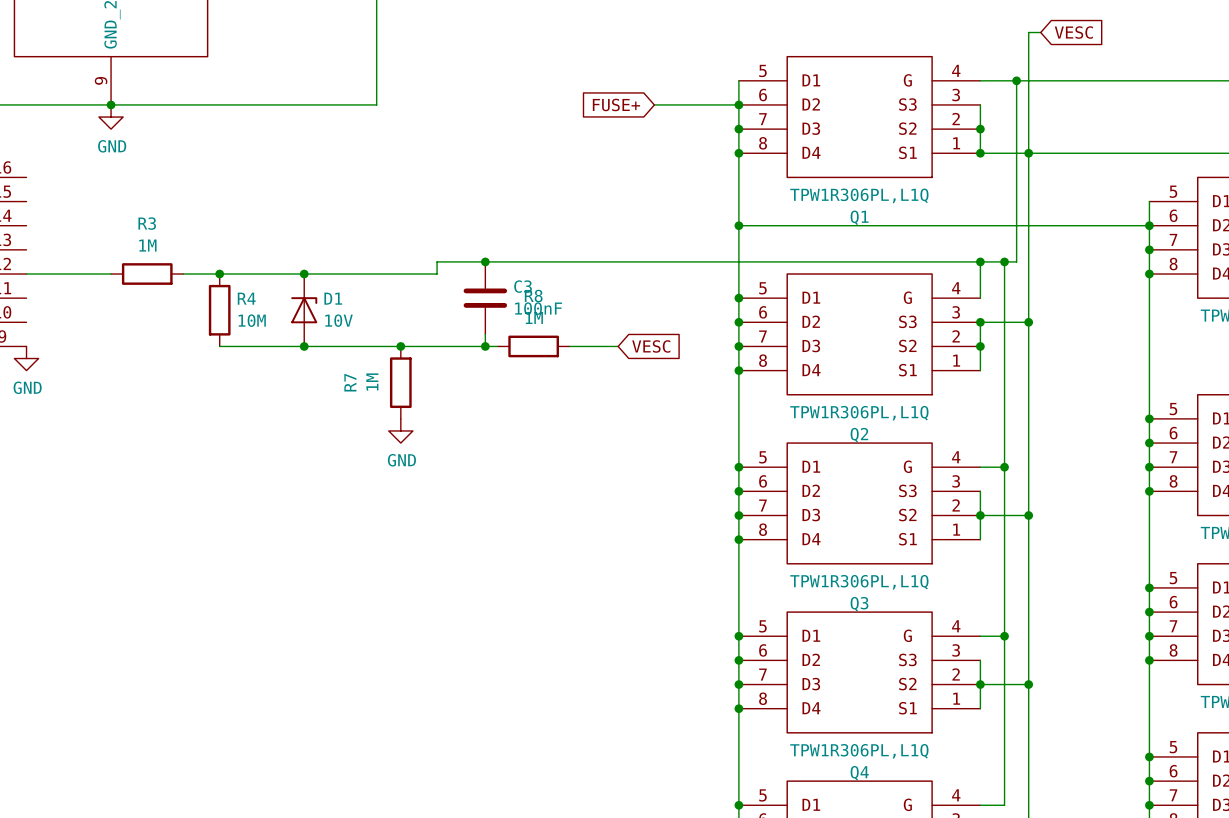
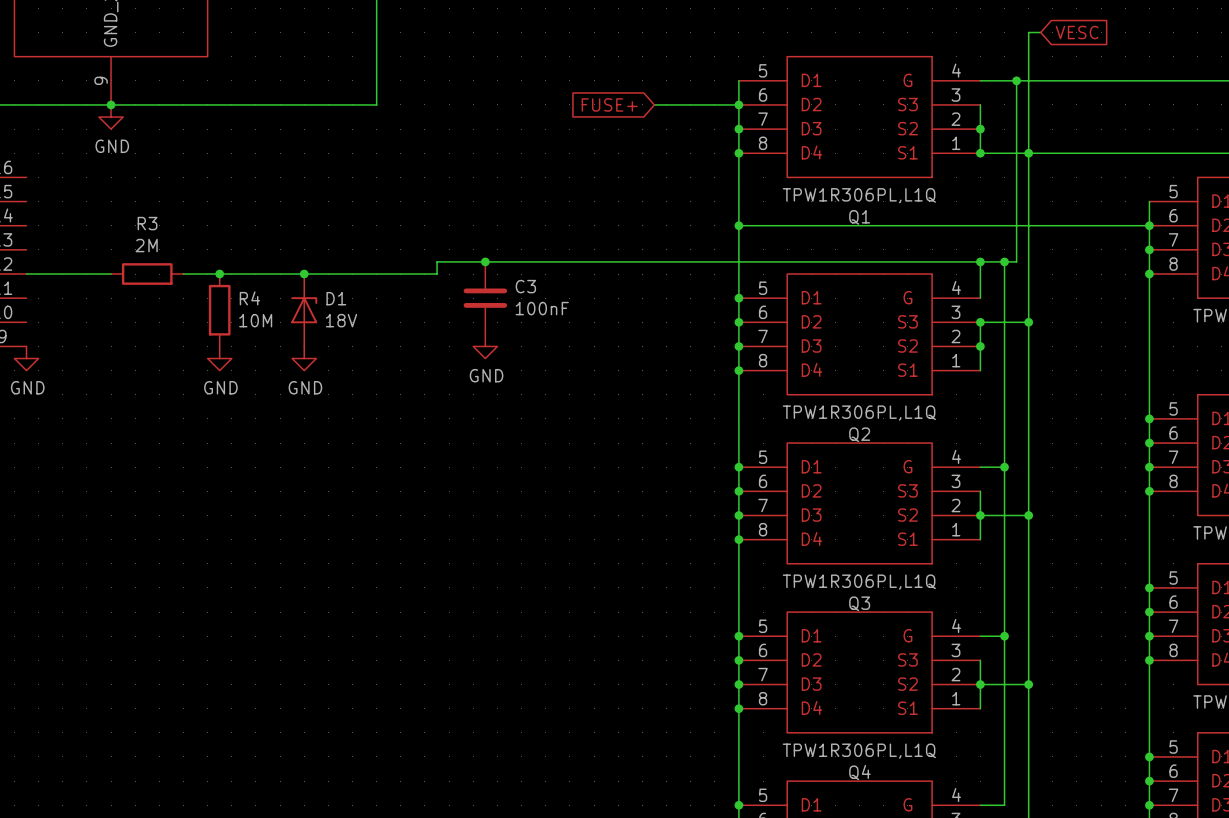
R3 value: 1M (147, 245) -> 2M (146, 245)
D1 value: 10V (339, 320) -> 18V (341, 320)
wire: (219, 346) (497, 346) -> none
junction: (304, 346) -> none
junction: (400, 346) -> none
junction: (485, 346) -> none
power symbol: none -> GND (485, 346)
R8: 1M (533, 346) -> none
wire: (569, 346) (618, 346) -> none
global label: VESC (651, 346) -> none
power symbol: none -> GND (219, 358)
power symbol: none -> GND (304, 358)
R7: 1M (400, 382) -> none
power symbol: GND (400, 430) -> none

